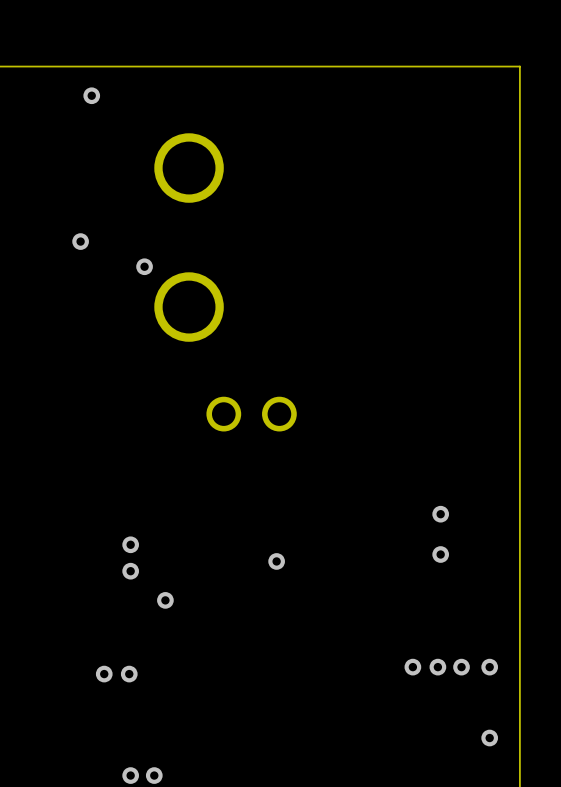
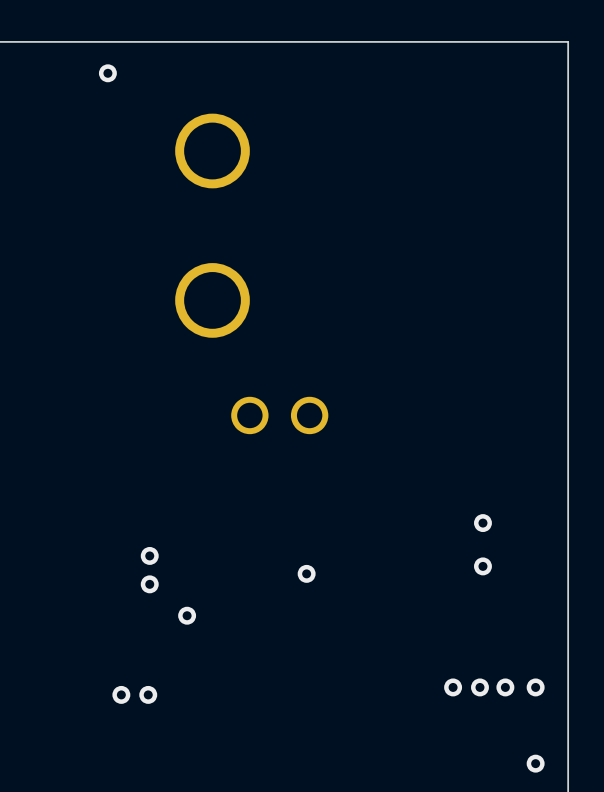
via: (80, 241) -> none
via: (144, 266) -> none

